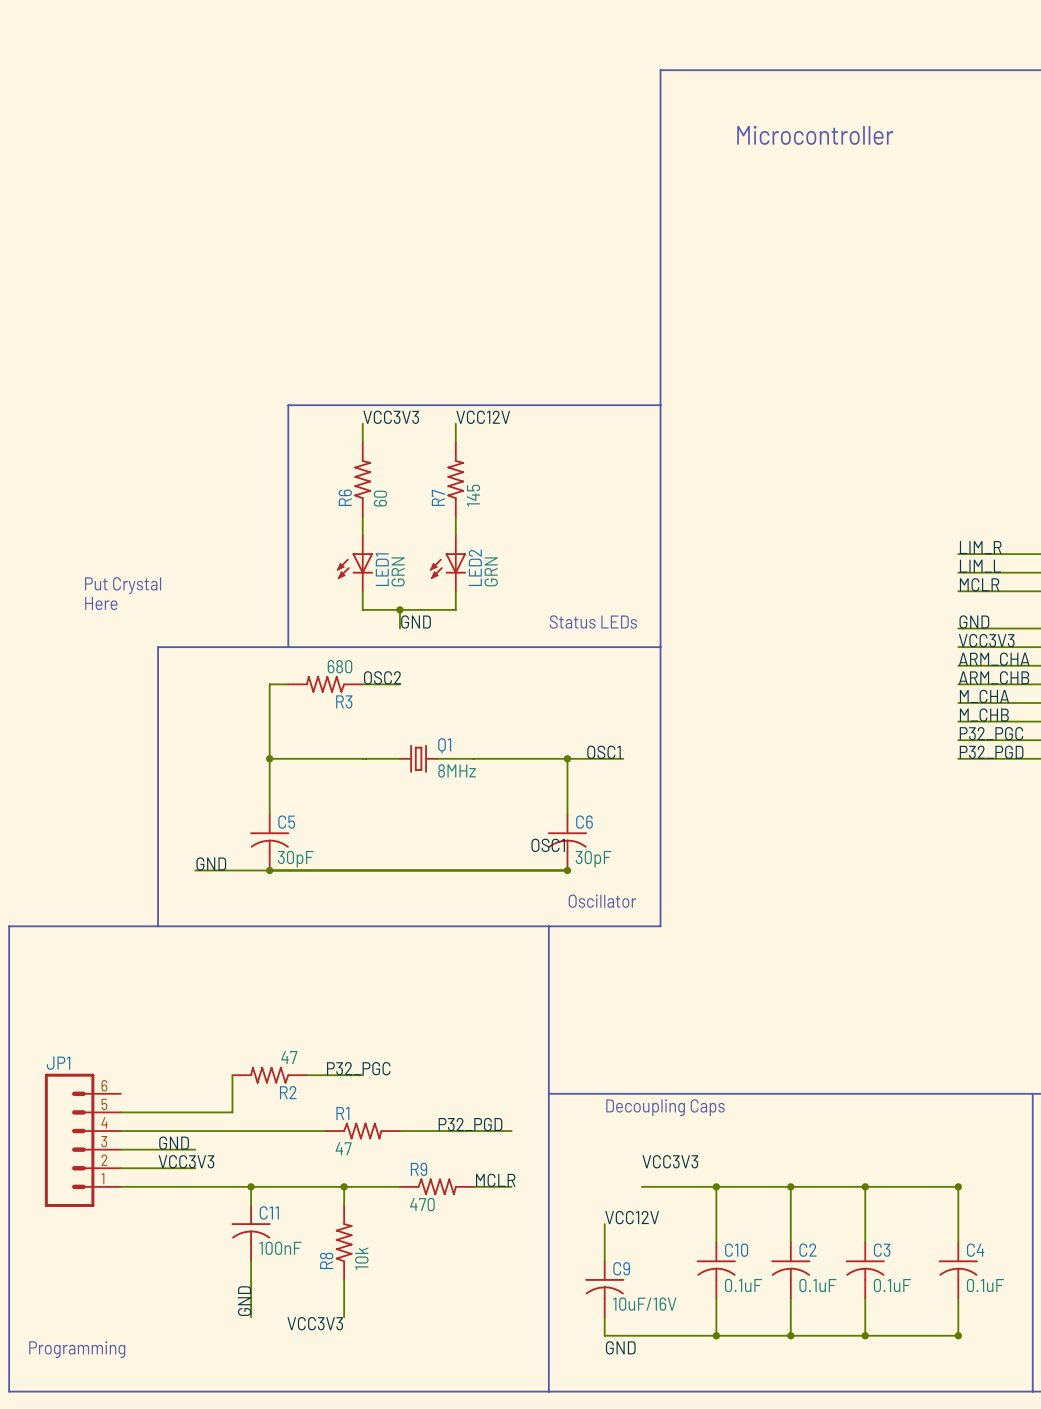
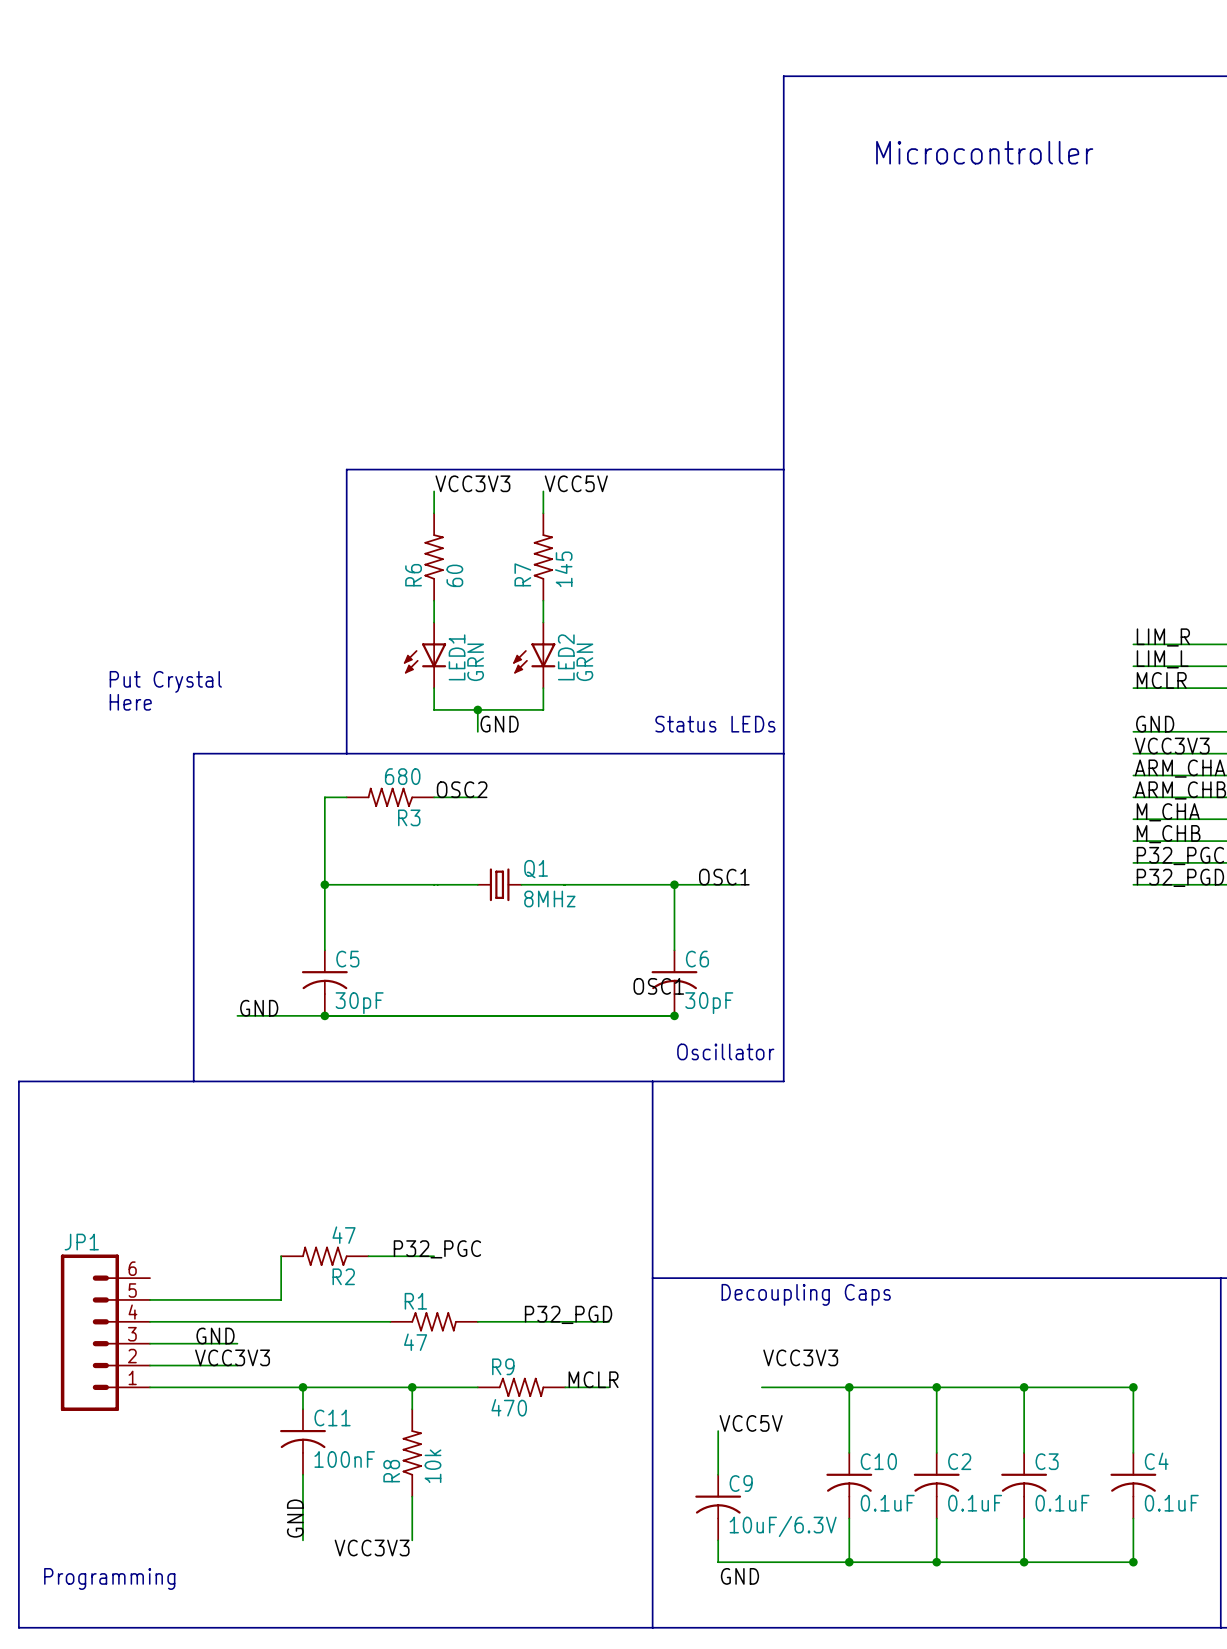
label: VCC12V (483, 417) -> VCC5V (576, 483)
label: VCC12V (632, 1217) -> VCC5V (751, 1423)
C9 value: 10uF/16V (644, 1304) -> 10uF/6.3V (783, 1526)

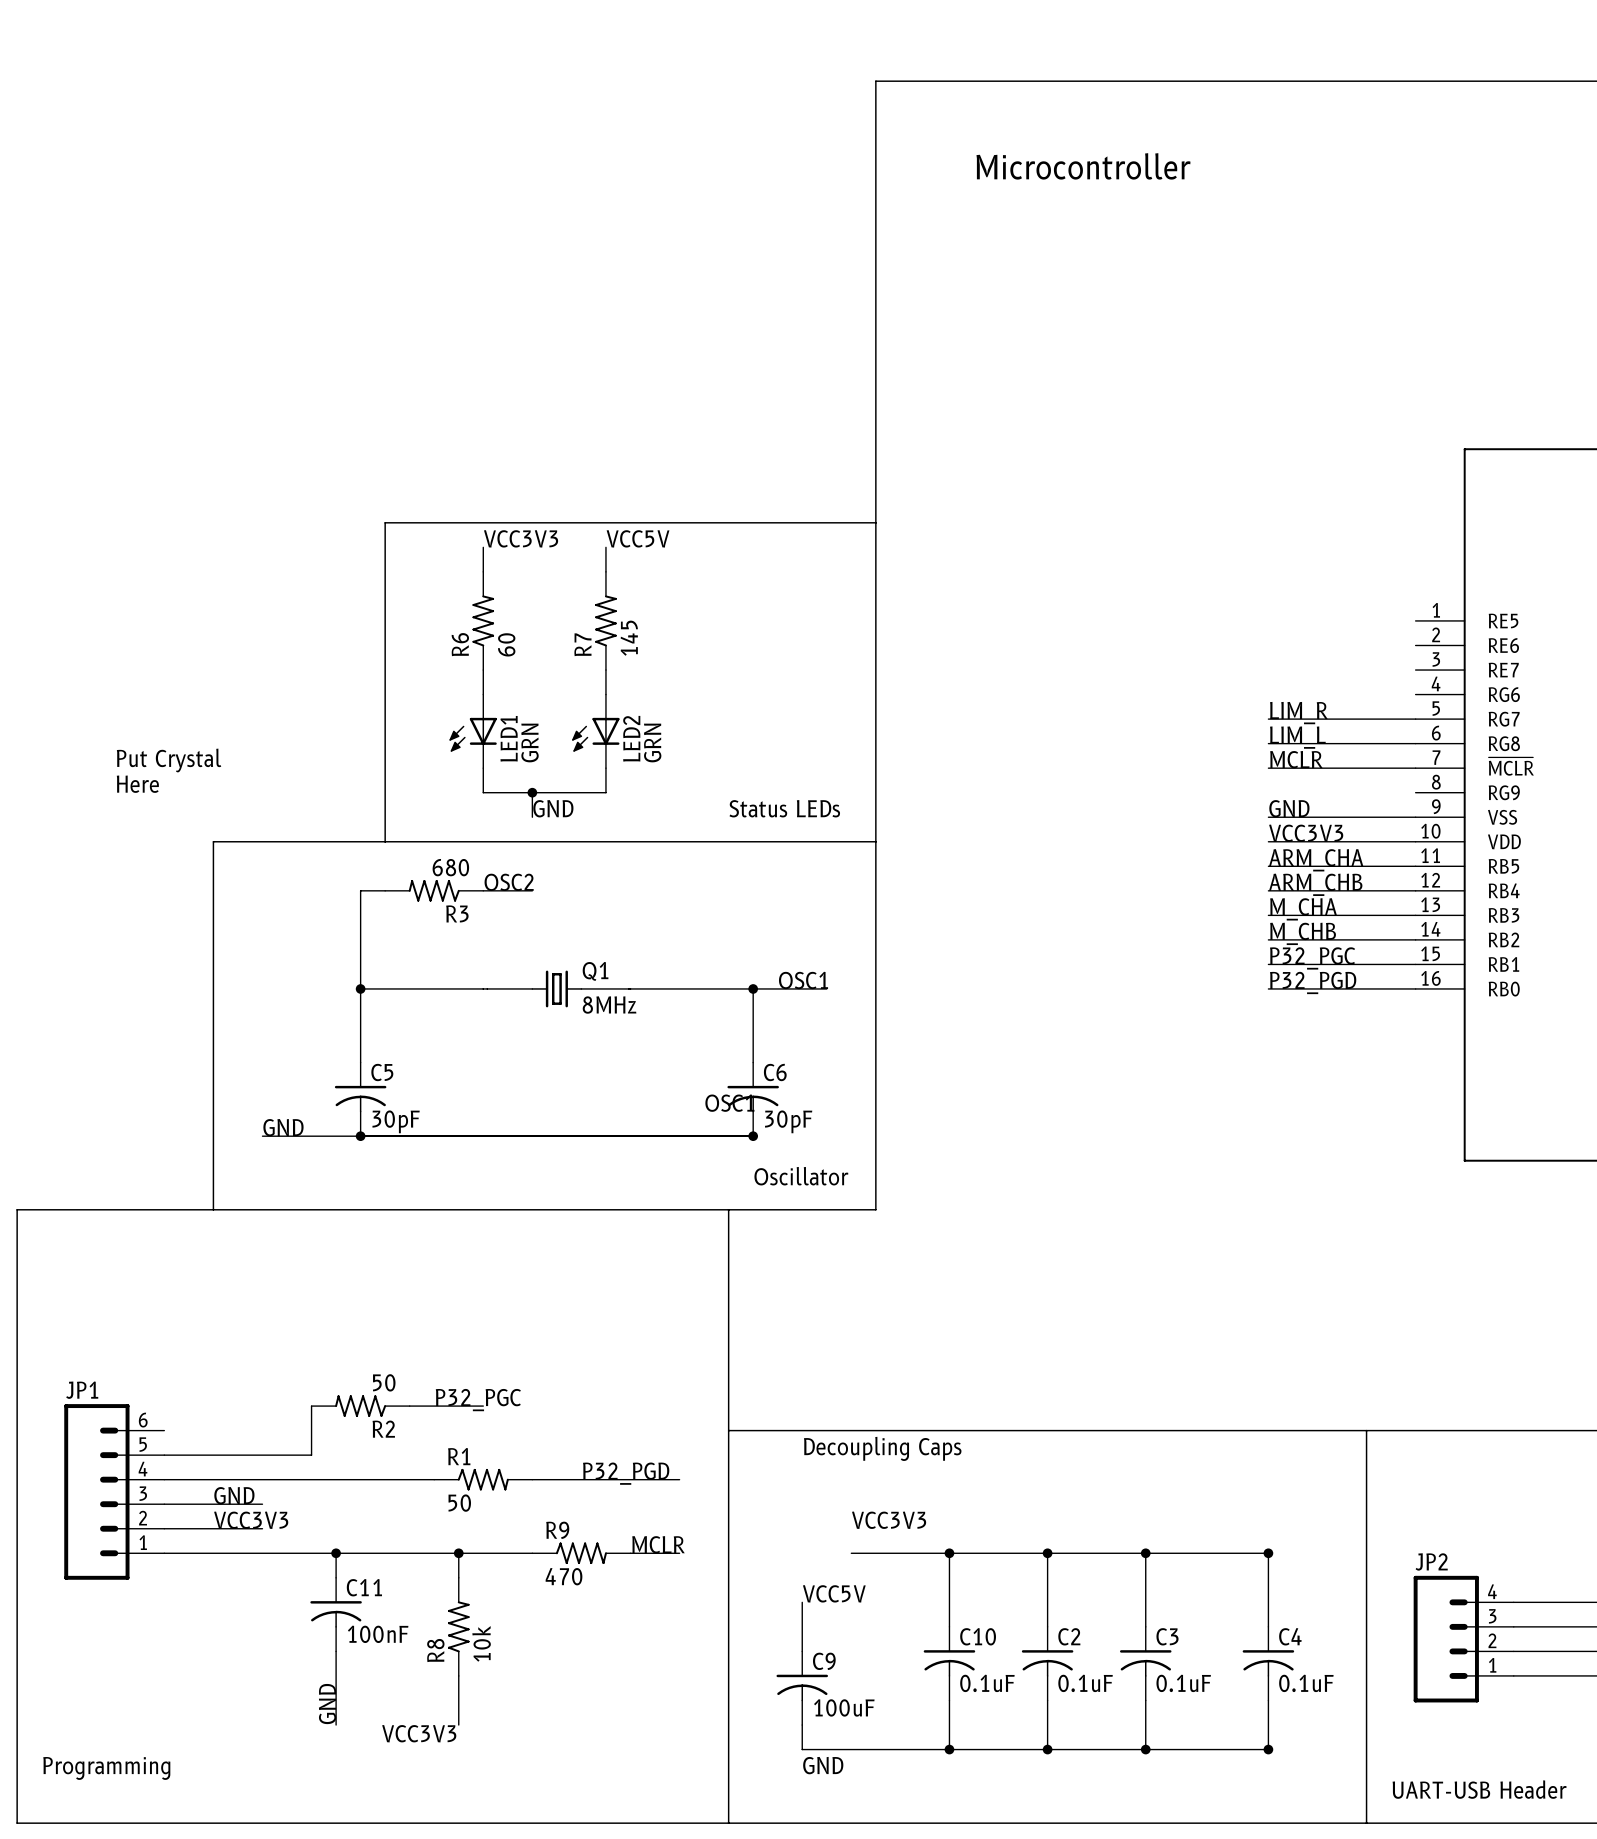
R2 value: 47 (344, 1235) -> 50 (384, 1382)
R1 value: 47 (415, 1342) -> 50 (459, 1503)
C9 value: 10uF/6.3V (783, 1526) -> 100uF (844, 1707)

